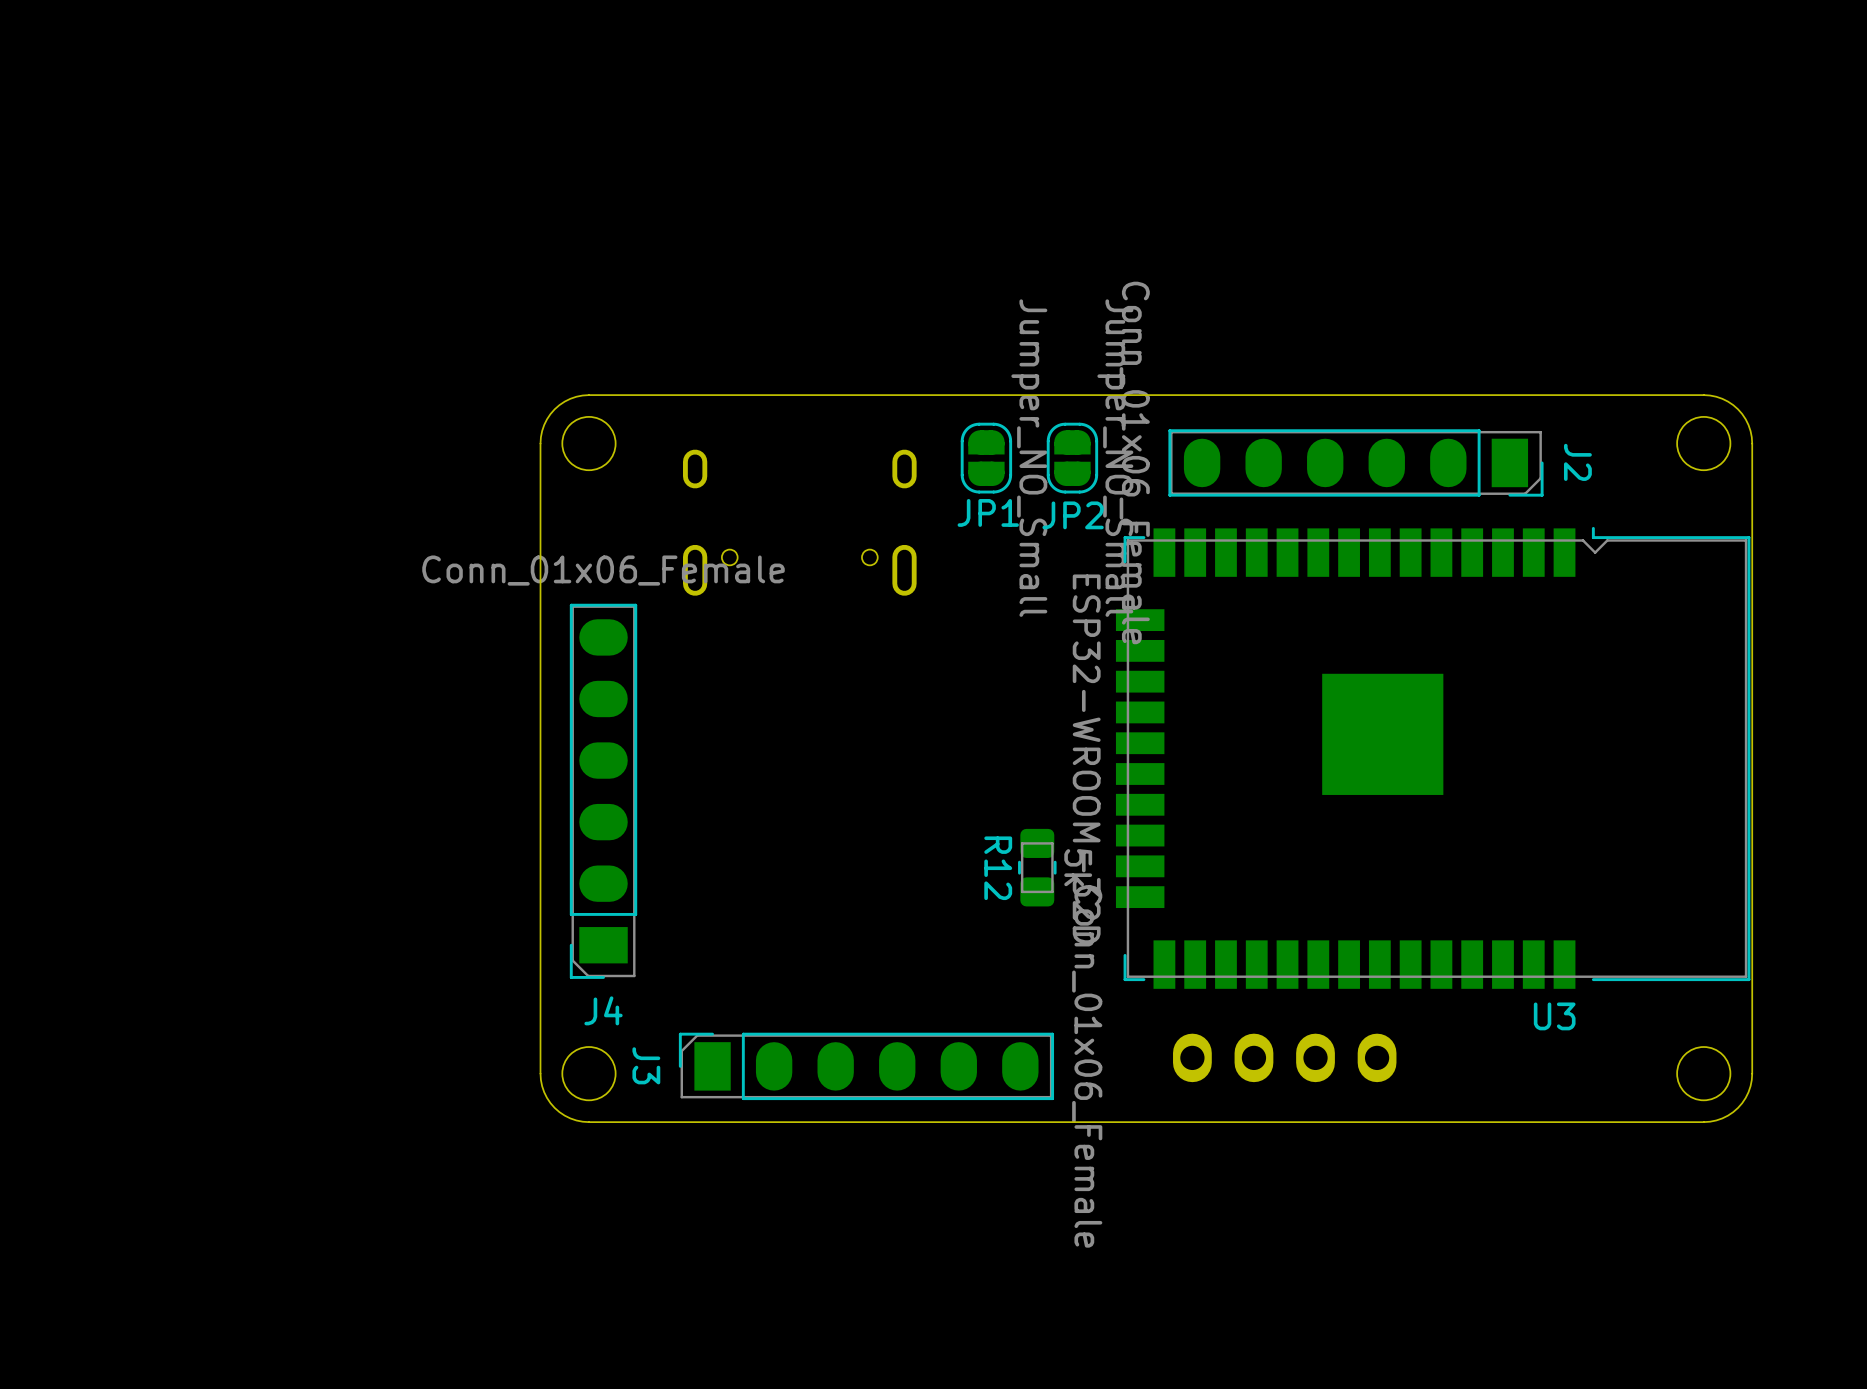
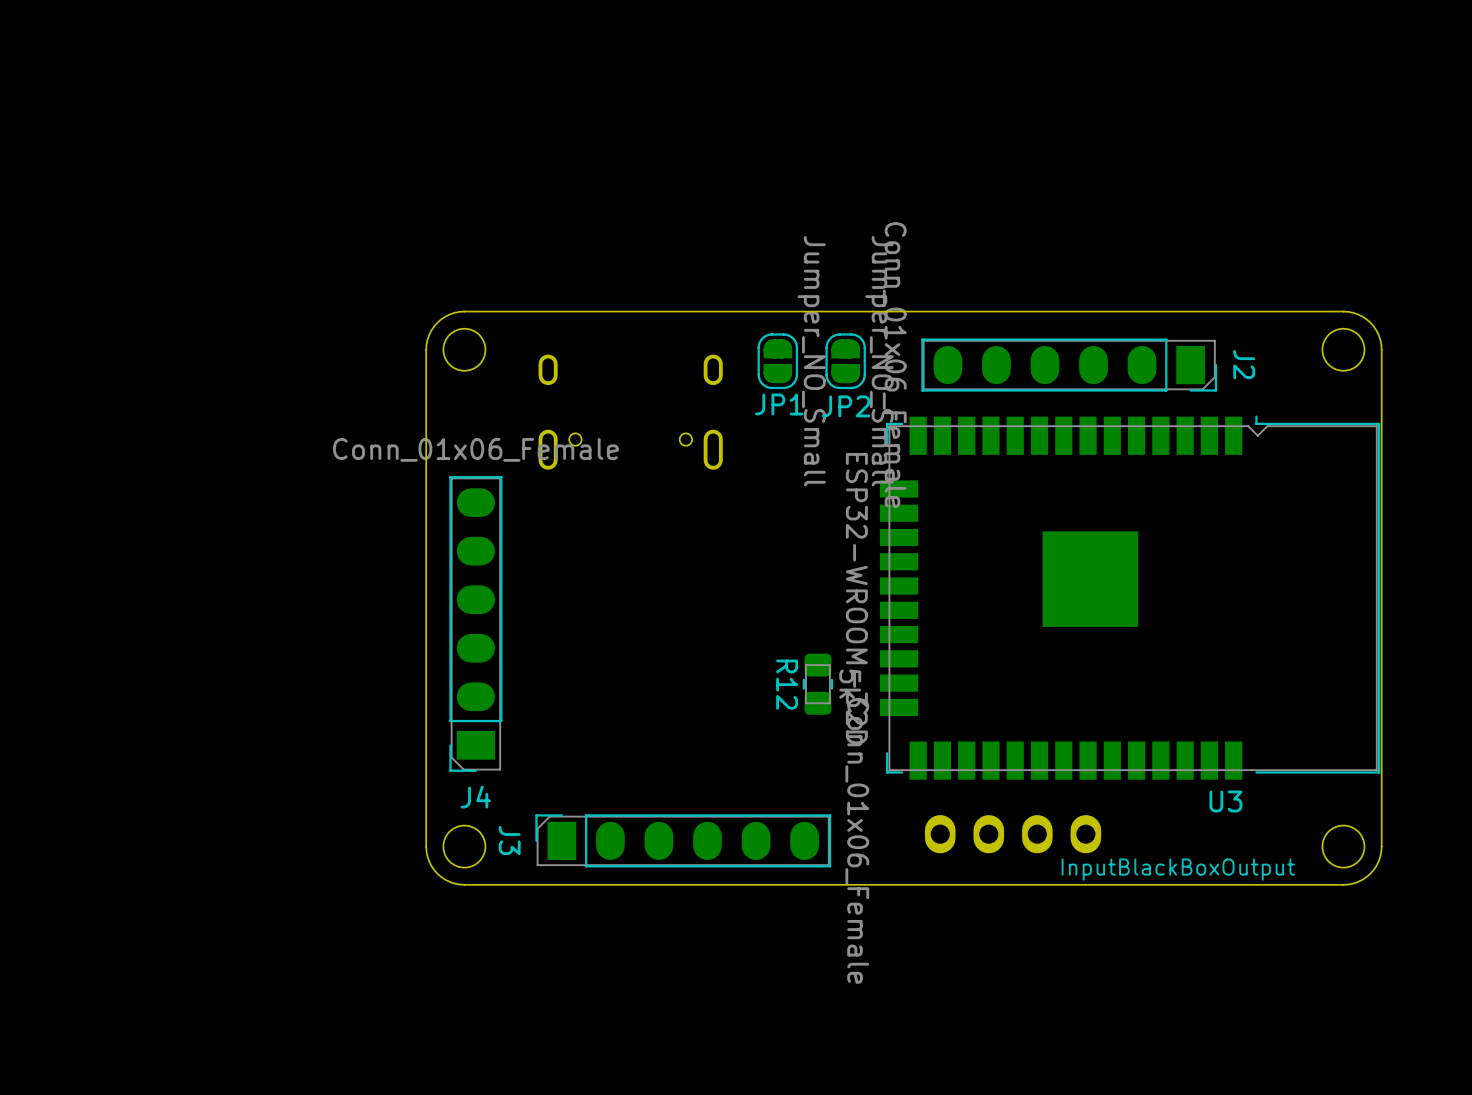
text: none -> InputBlackBoxOutput (1178, 869)

